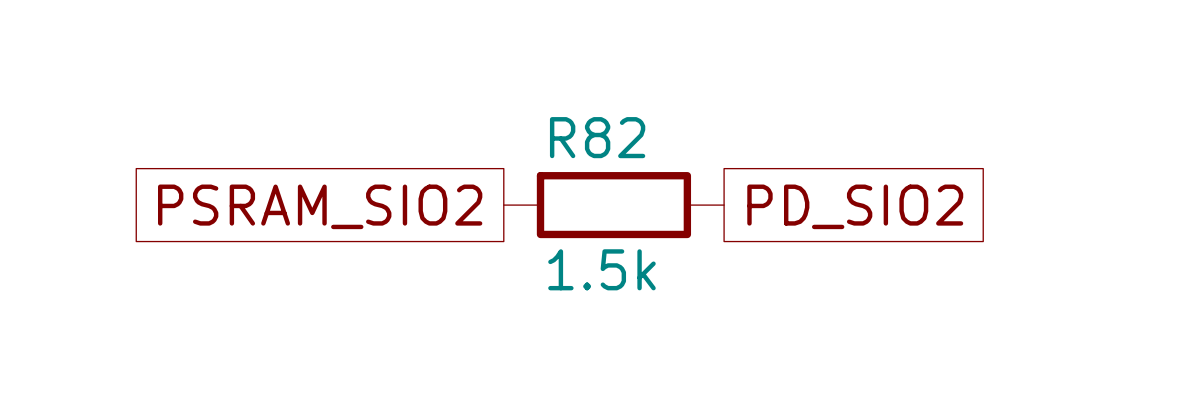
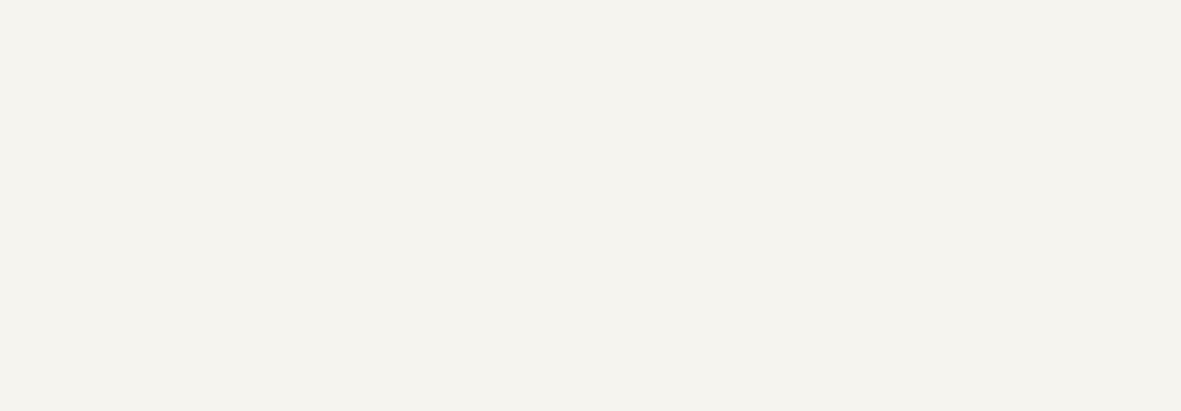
R82: 1.5k (613, 205) -> none
global label: PSRAM_SIO2 (320, 206) -> none
global label: PD_SIO2 (855, 206) -> none

